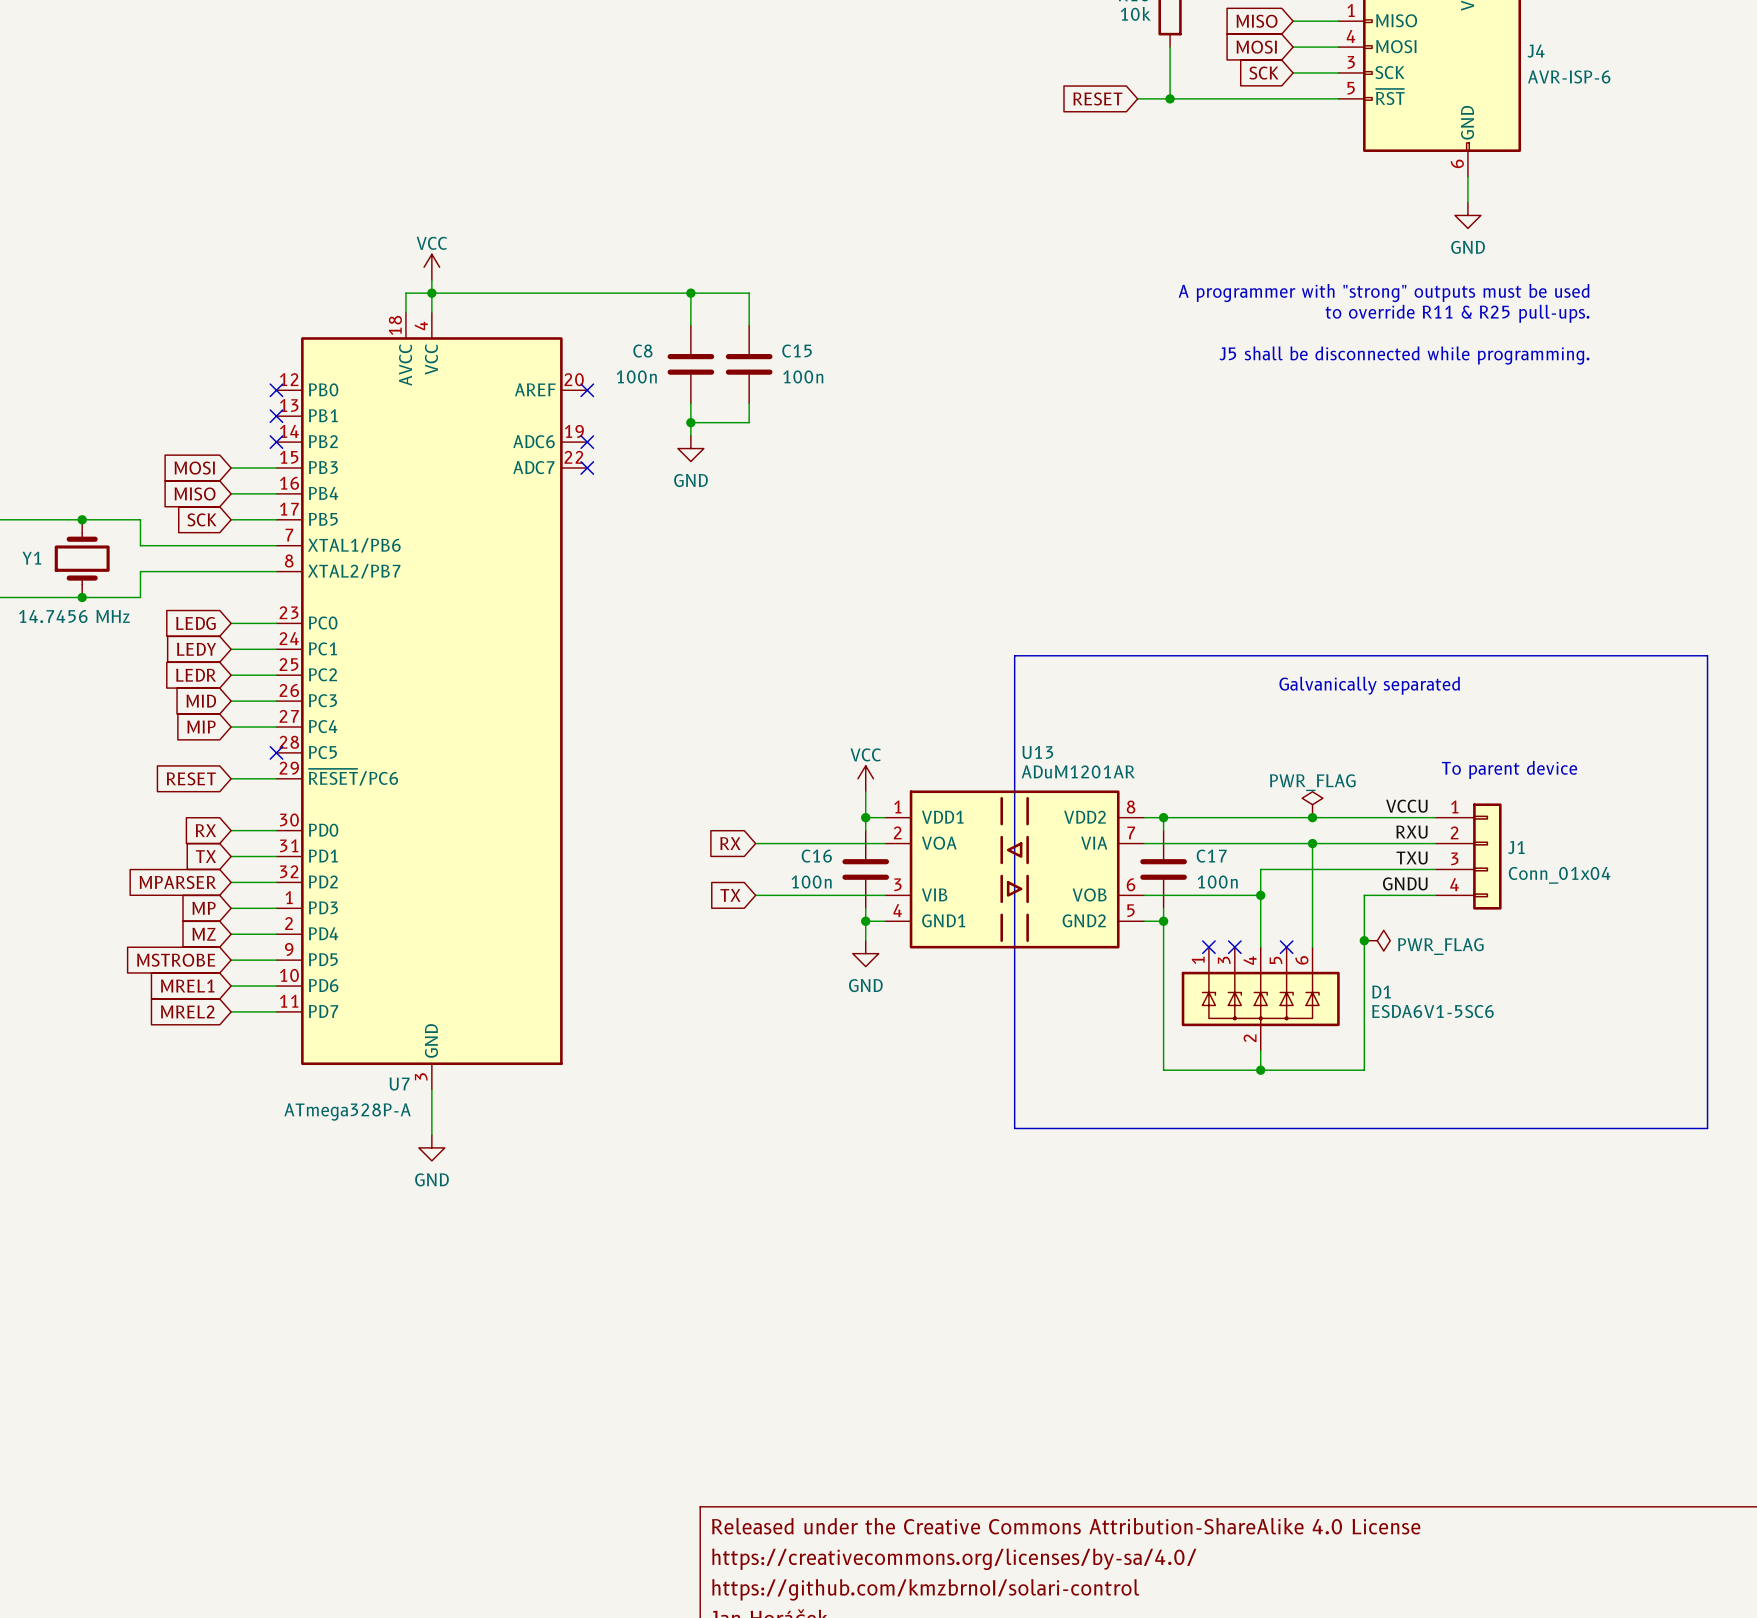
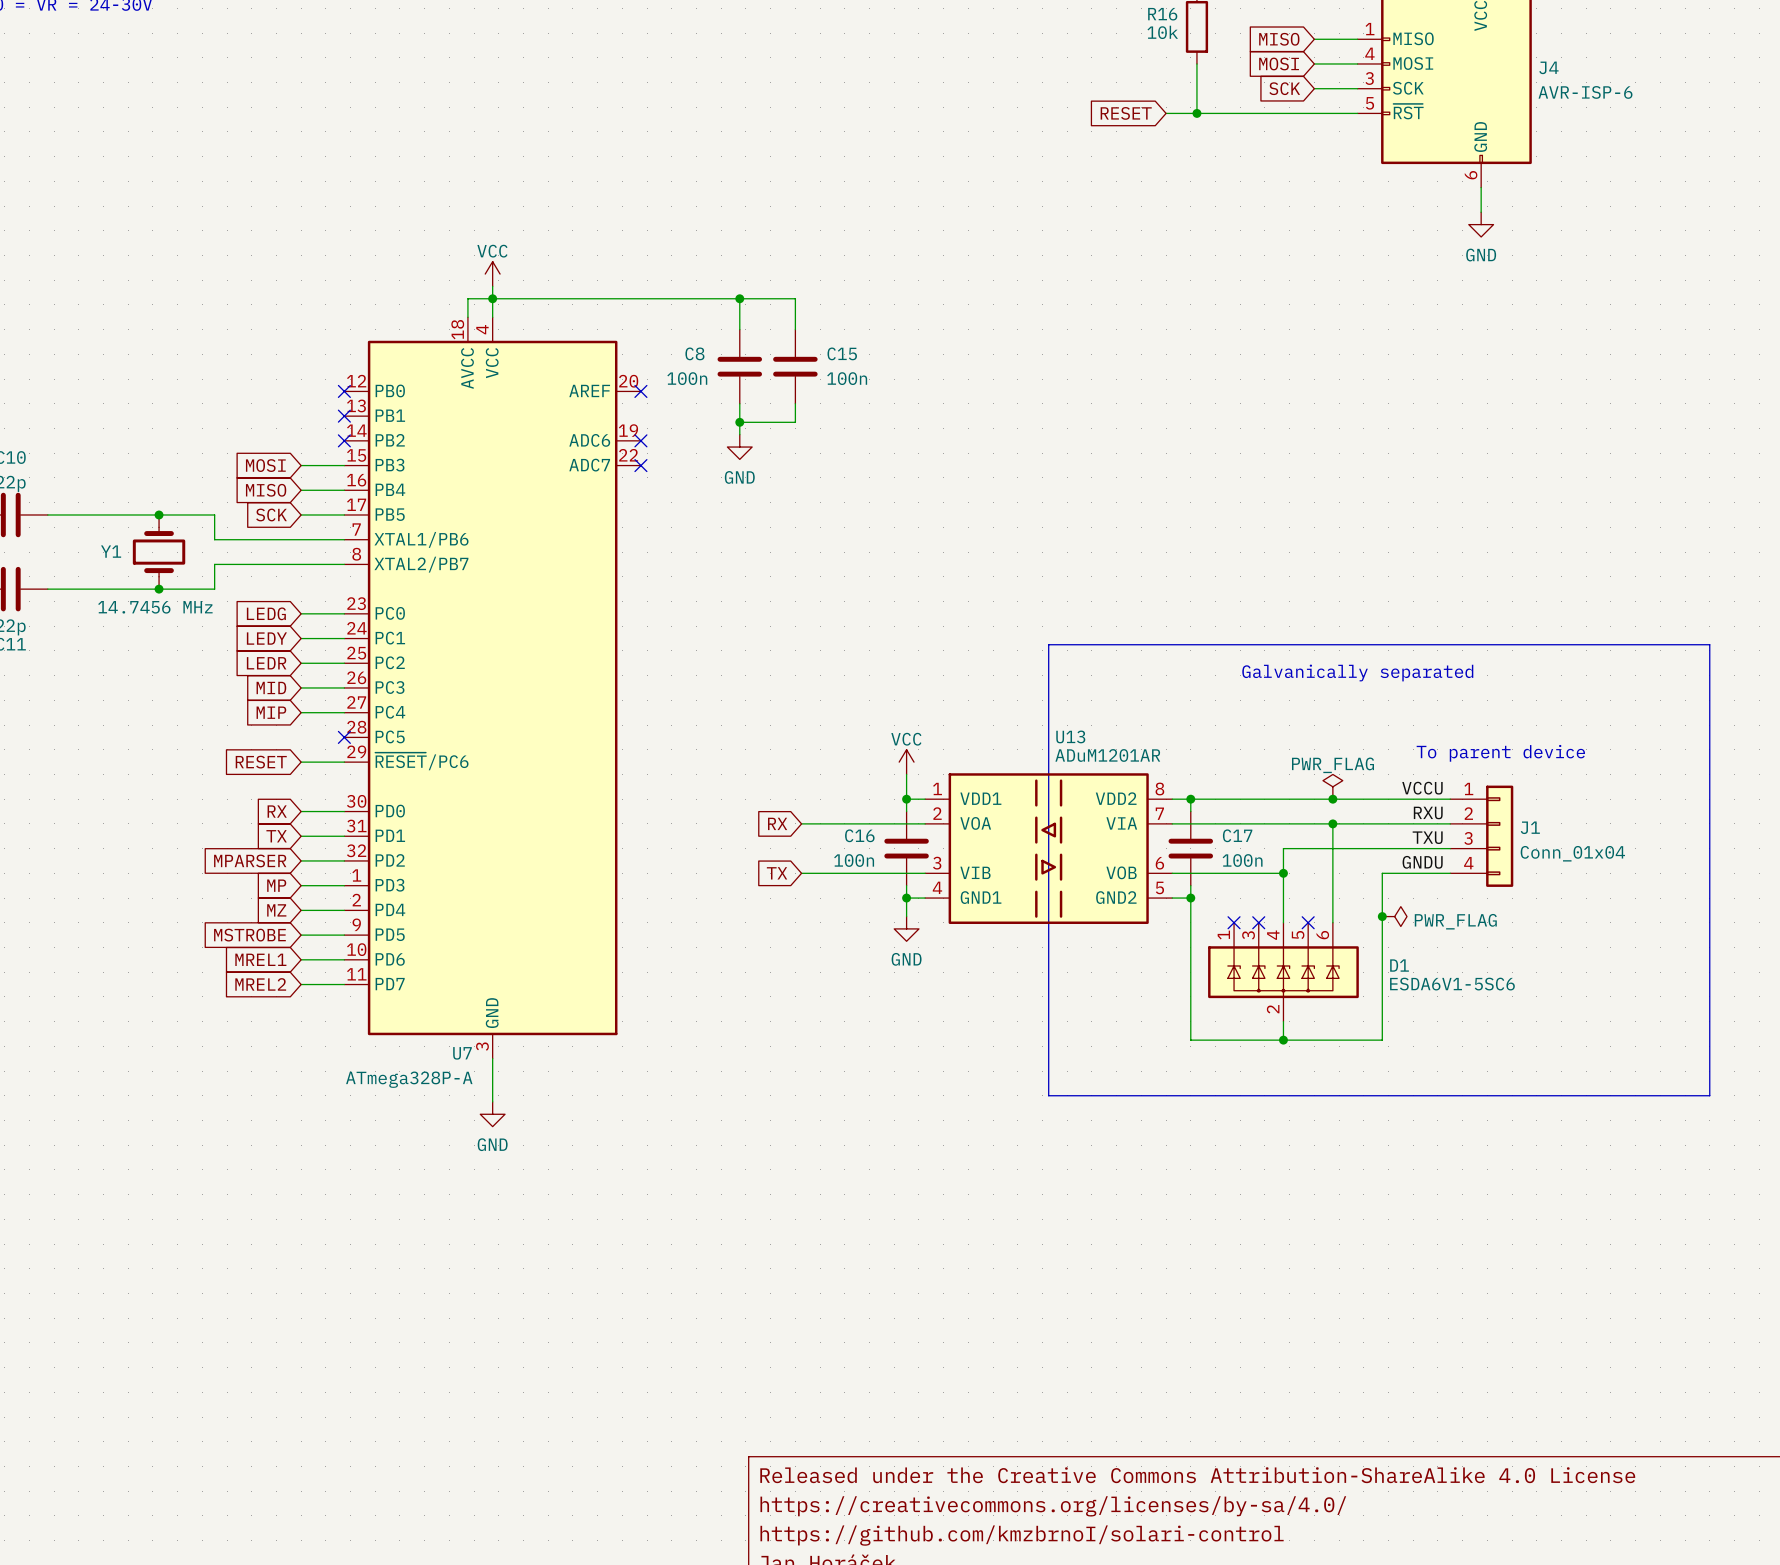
text: A programmer with "strong" outputs must be used (1384, 292) -> none
text: to override R11 & R25 pull-ups. (1457, 313) -> none
text: J5 shall be disconnected while programming. (1404, 355) -> none

